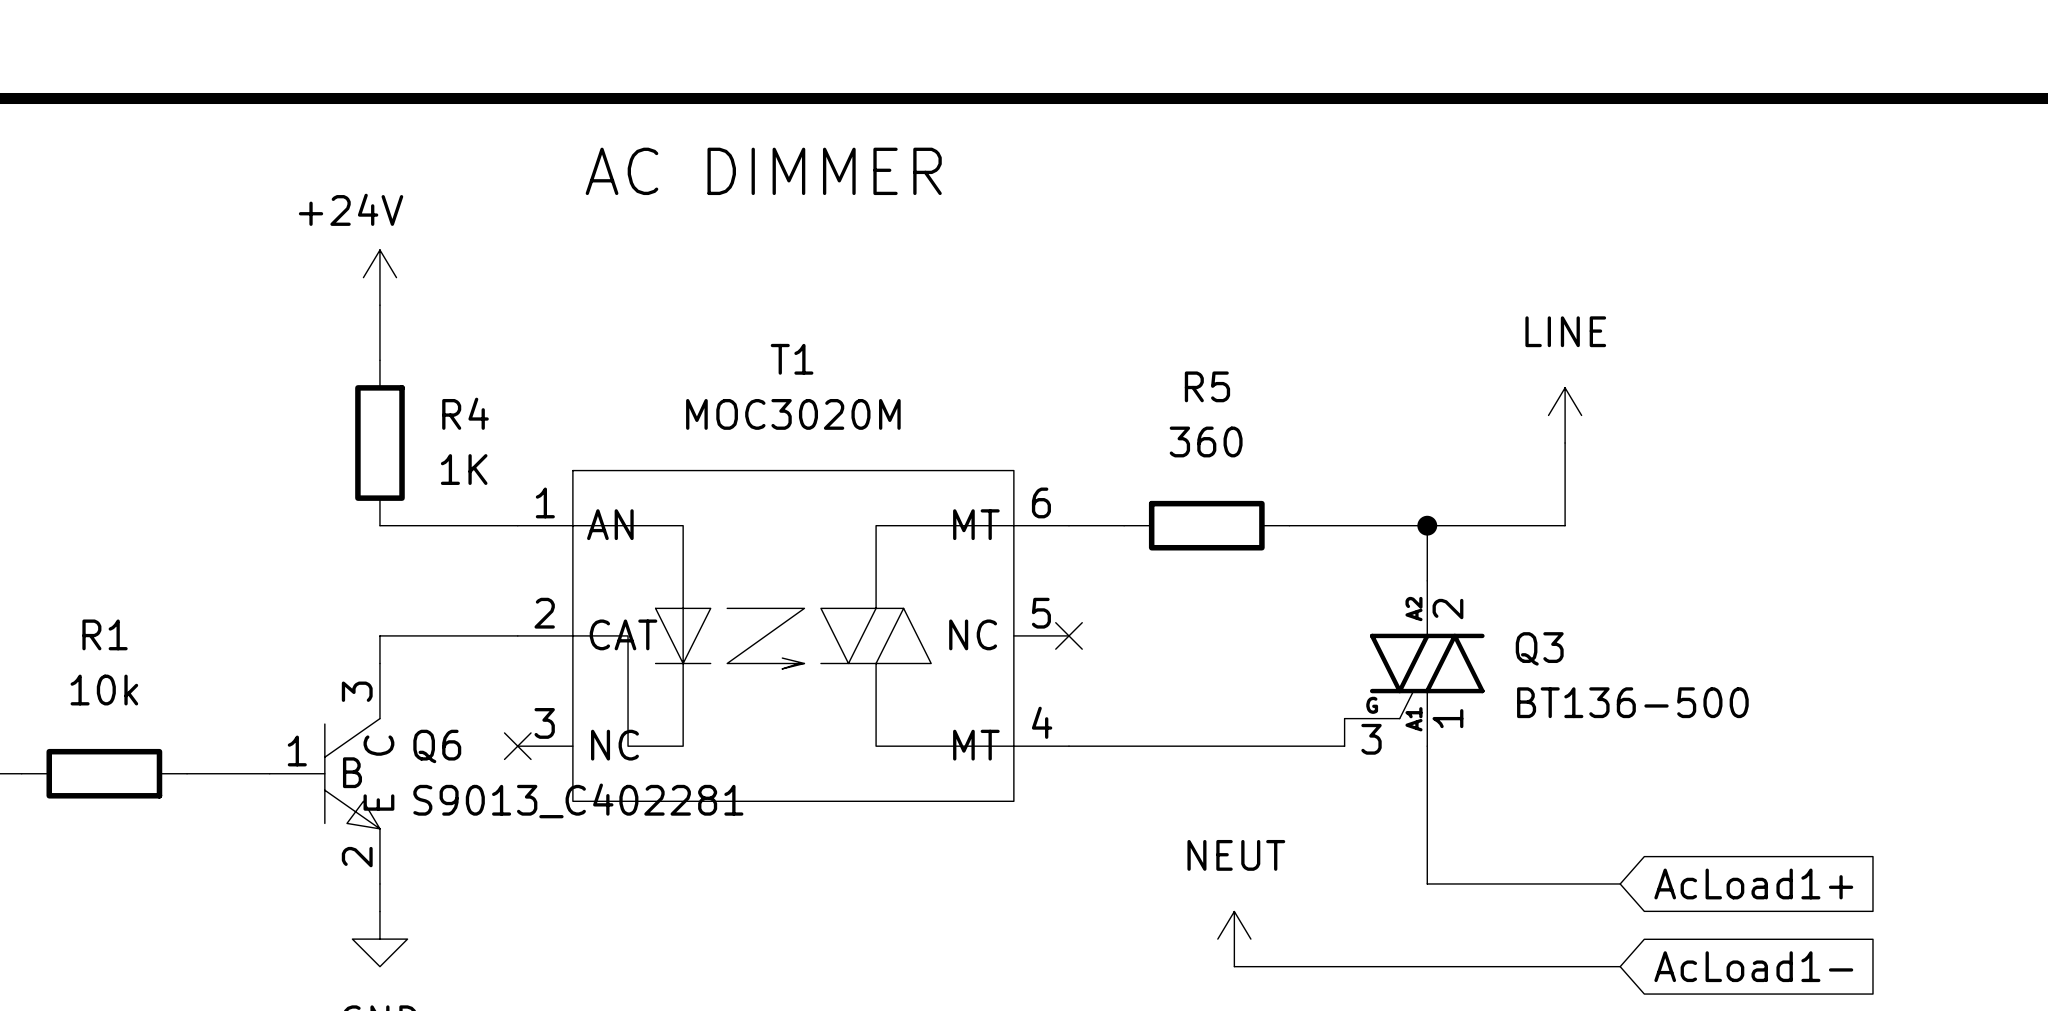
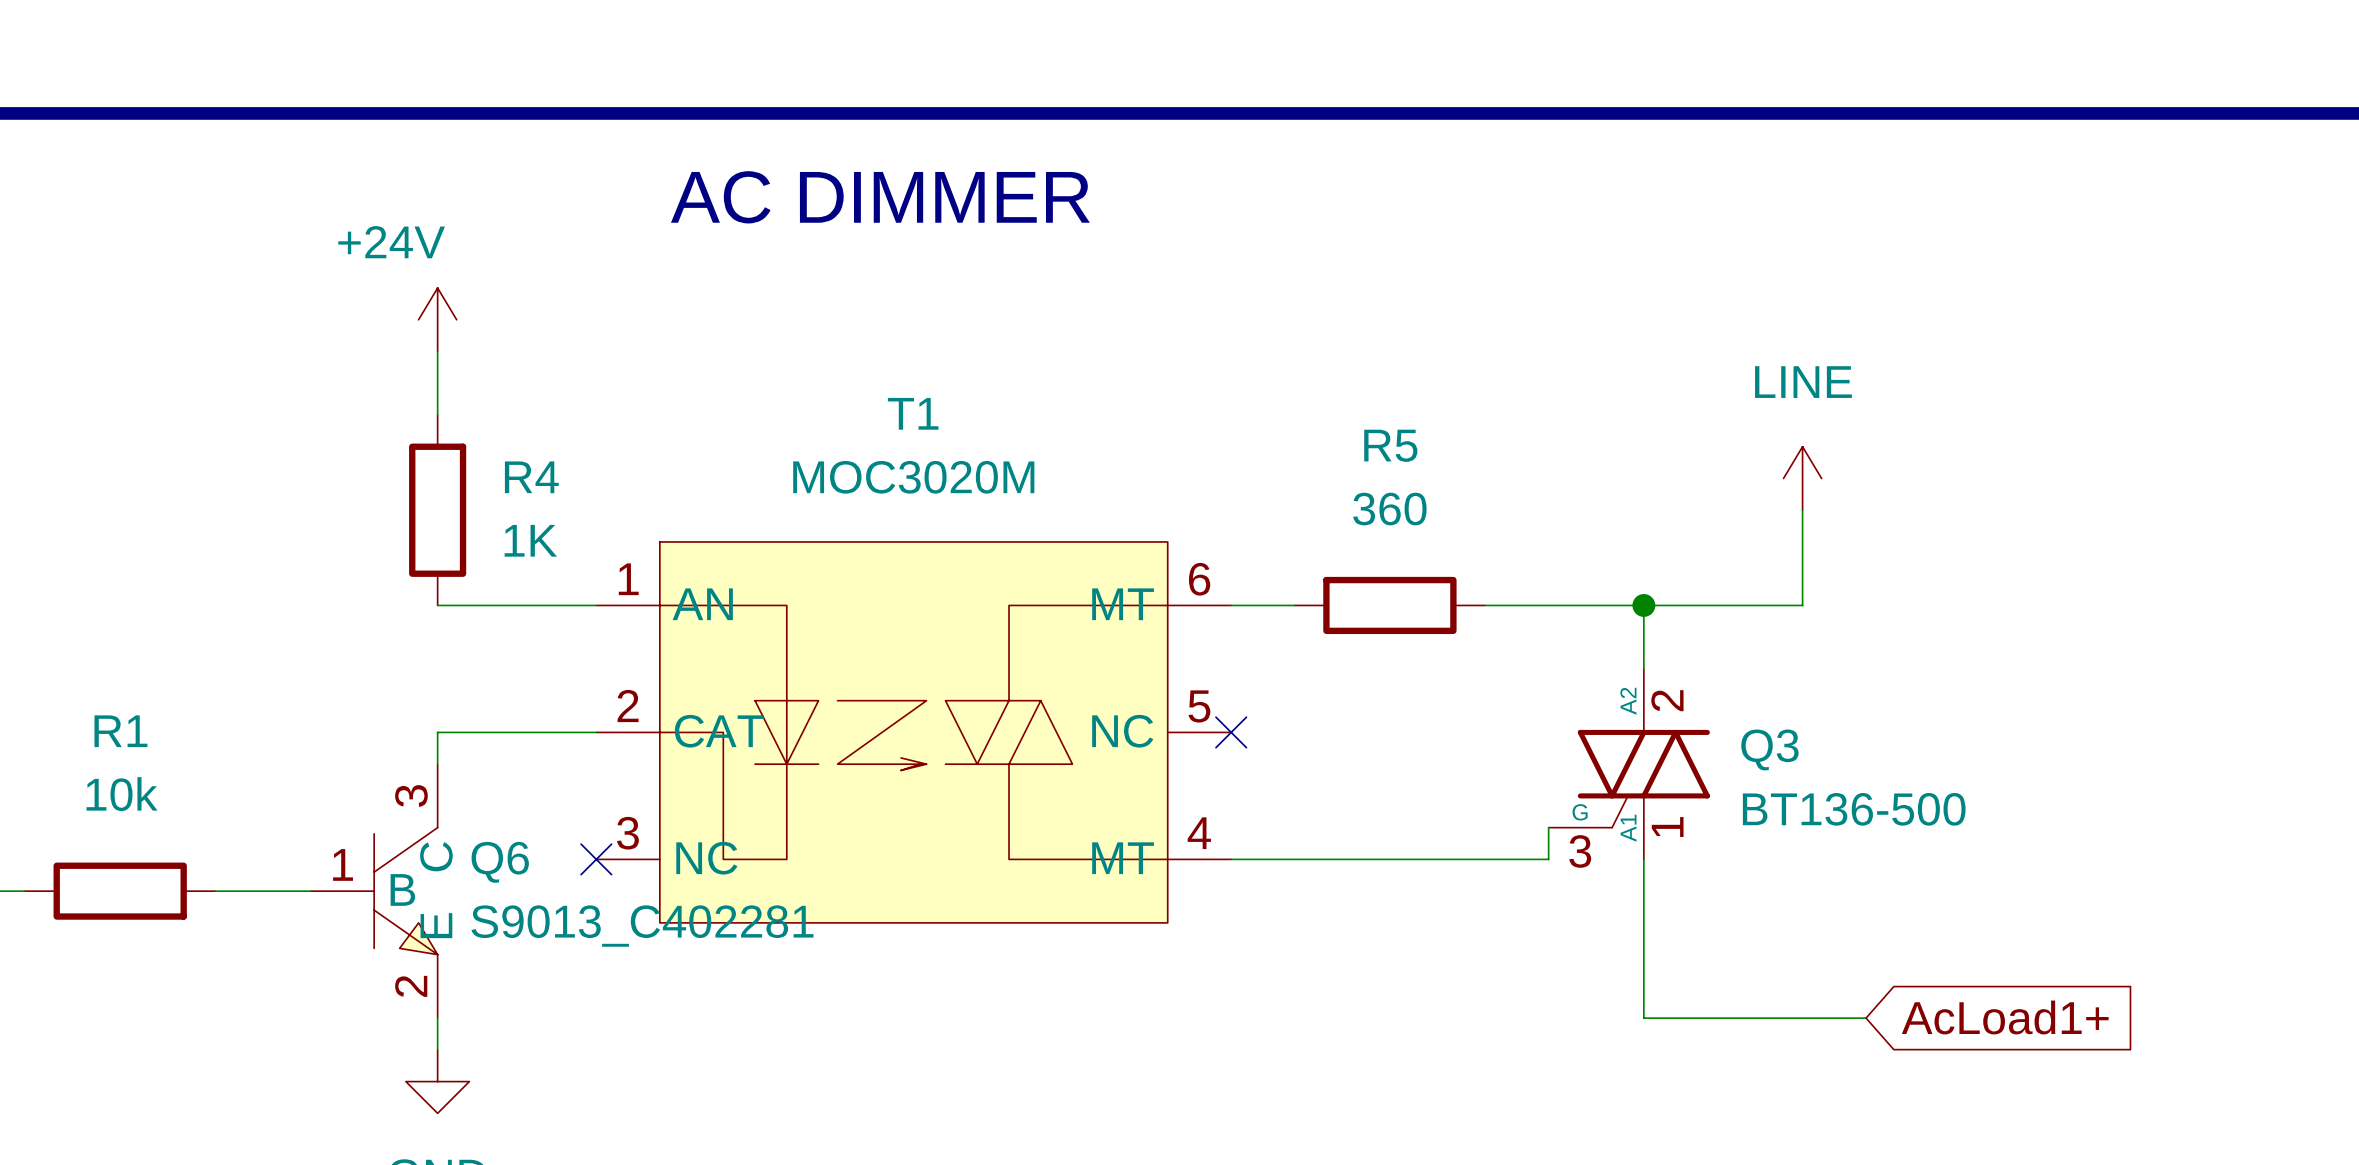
power symbol: NEUT (1234, 939) -> none
wire: (1234, 966) (1620, 966) -> none
global label: AcLoad1- (1753, 966) -> none

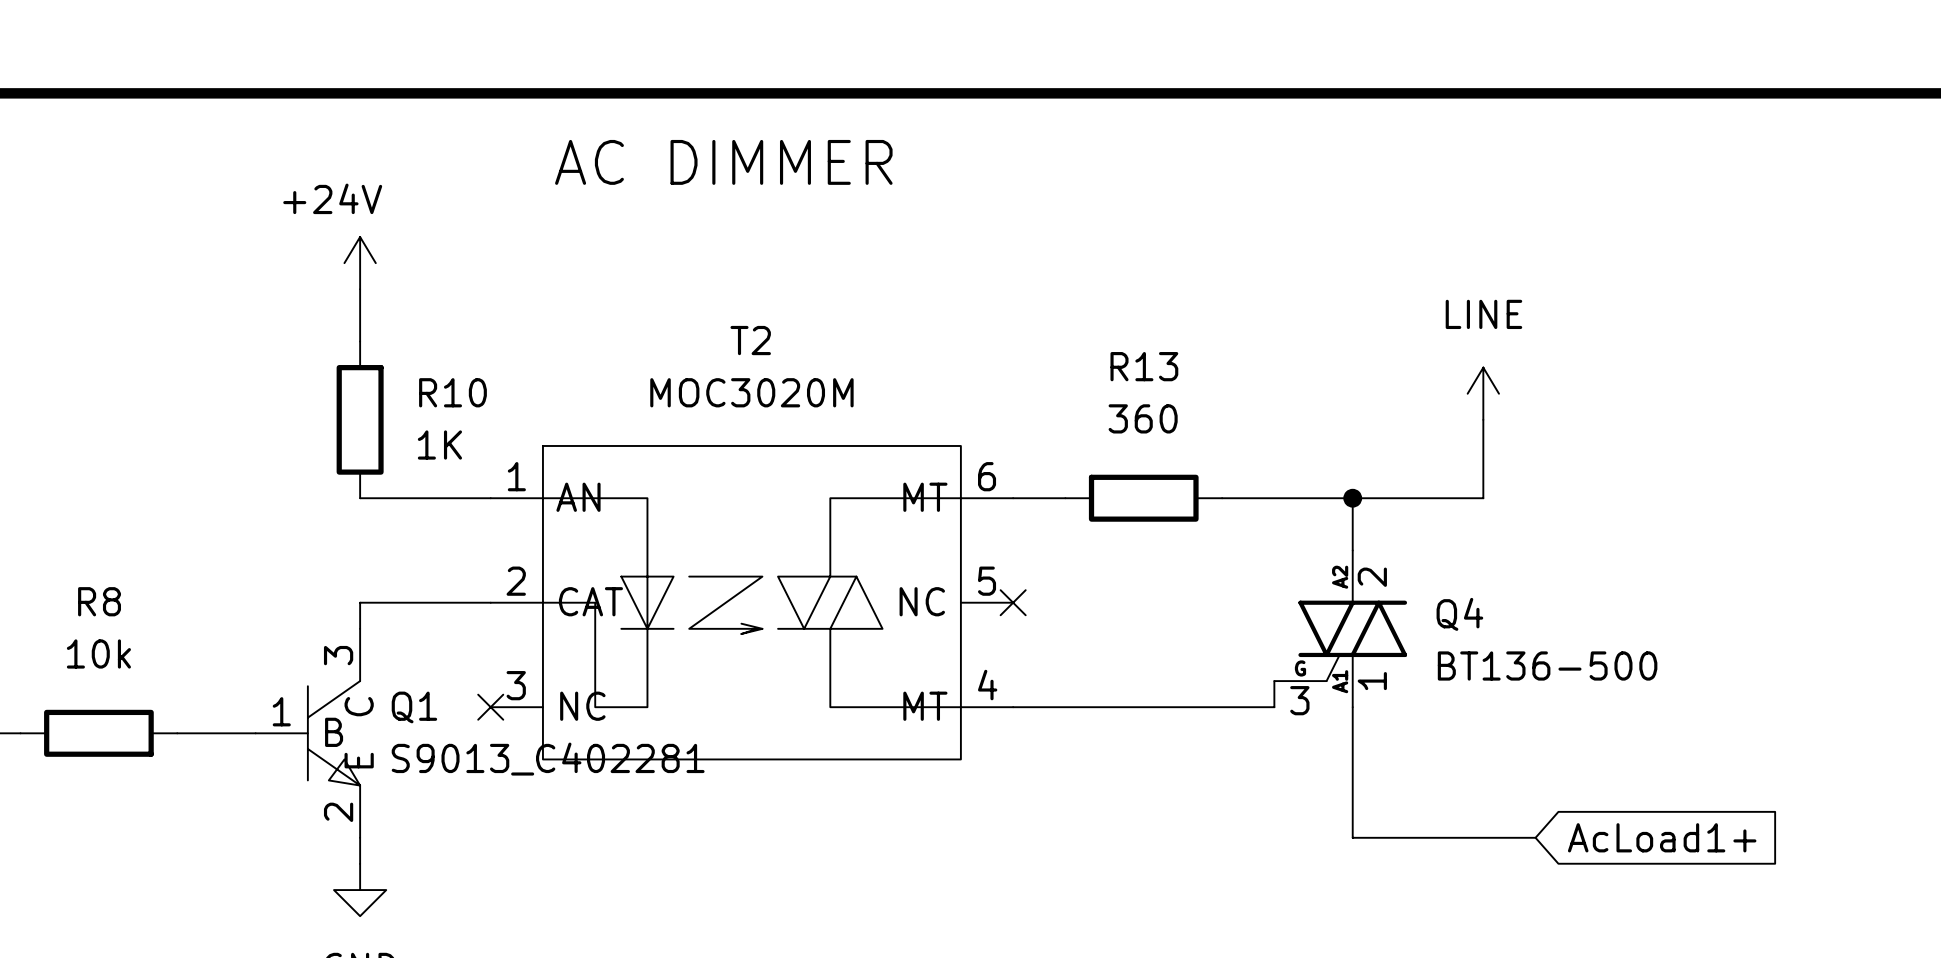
T1 name: T1 (913, 413) -> T2 (750, 340)
R5 name: R5 (1390, 445) -> R13 (1144, 366)
R4 name: R4 (531, 477) -> R10 (452, 392)
R1 name: R1 (120, 731) -> R8 (99, 601)
Q3 name: Q3 (1769, 749) -> Q4 (1459, 614)
Q6 name: Q6 (500, 862) -> Q1 (414, 707)

